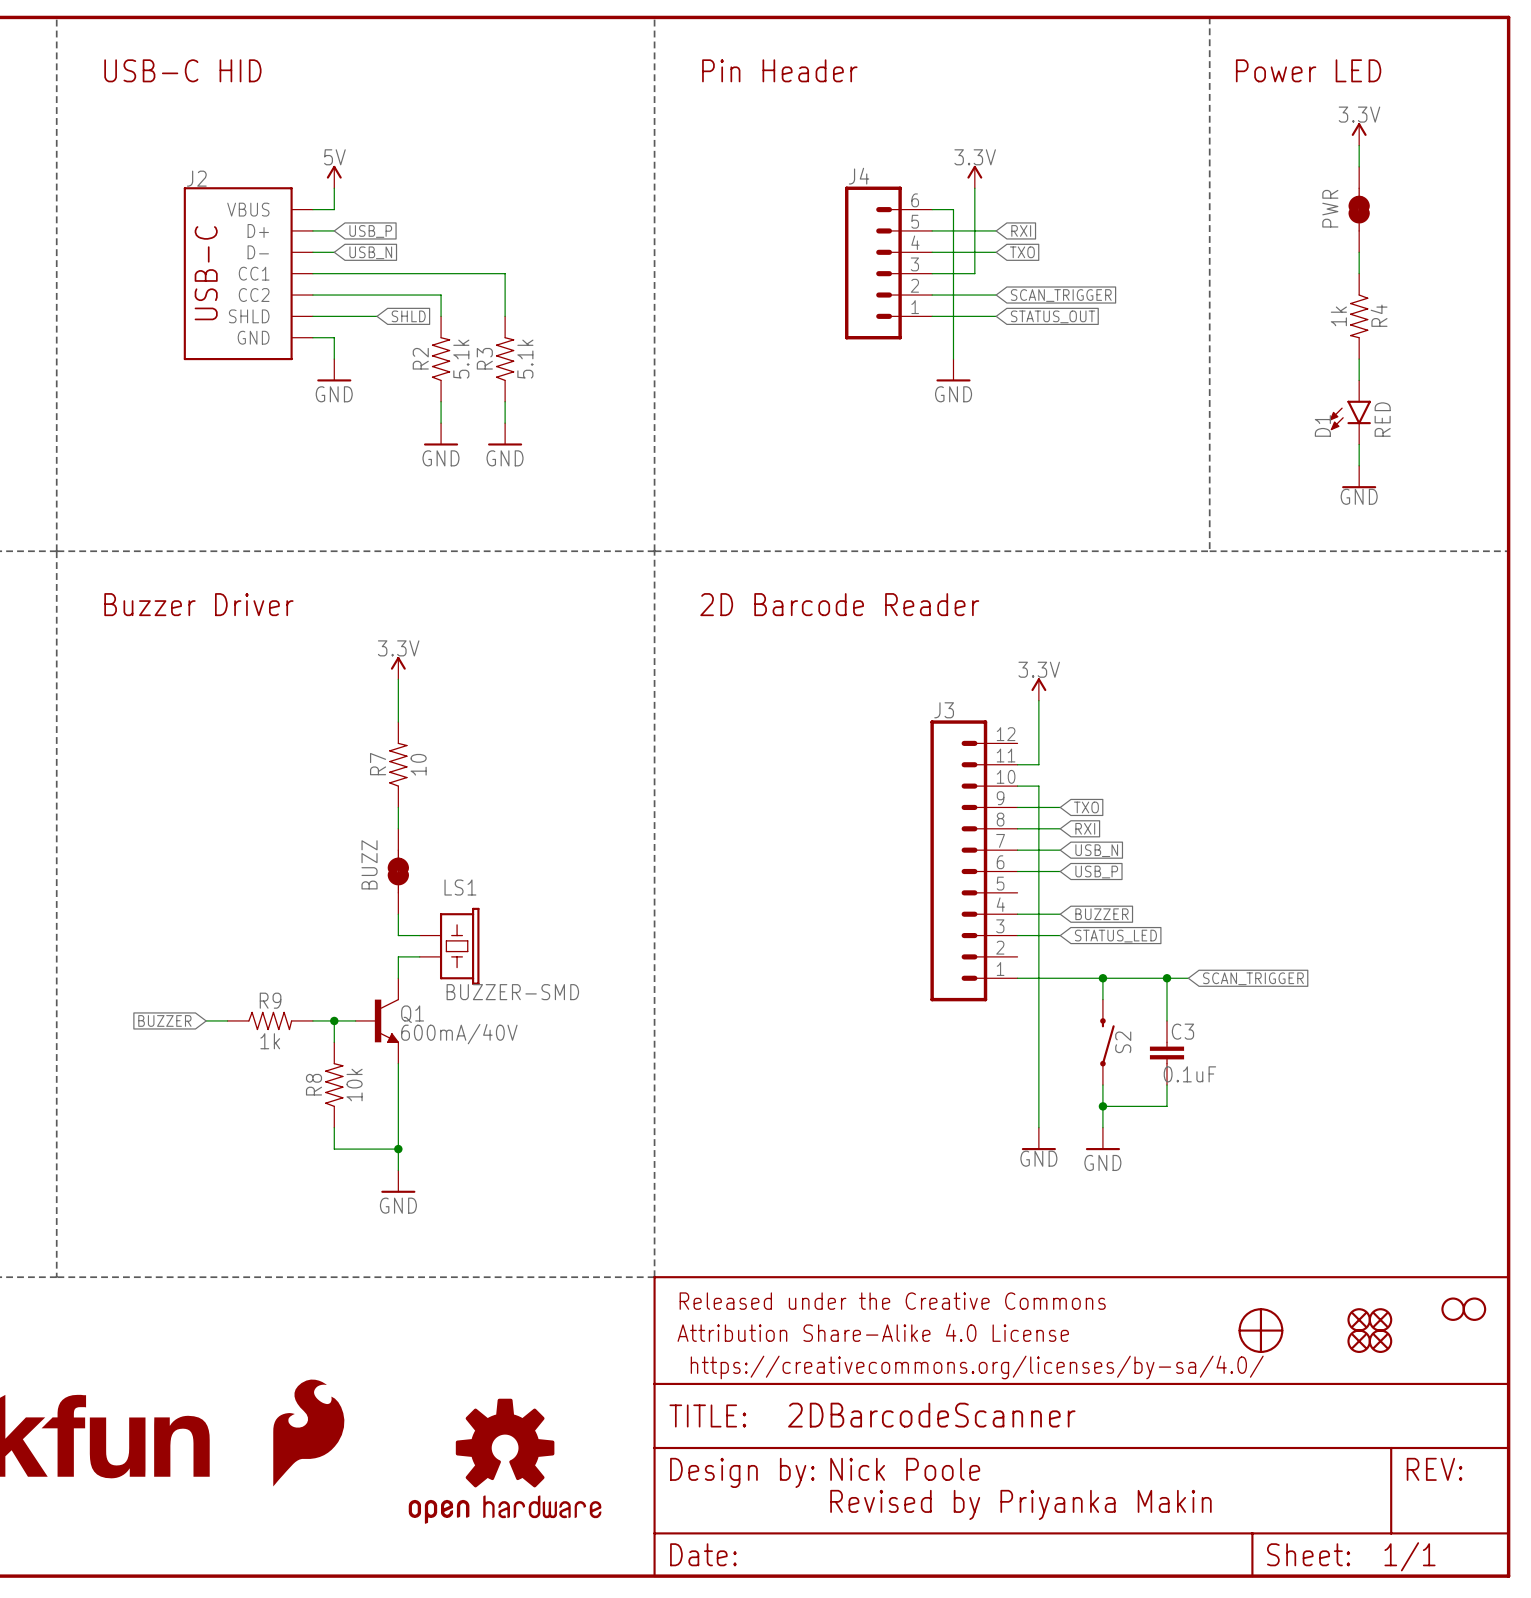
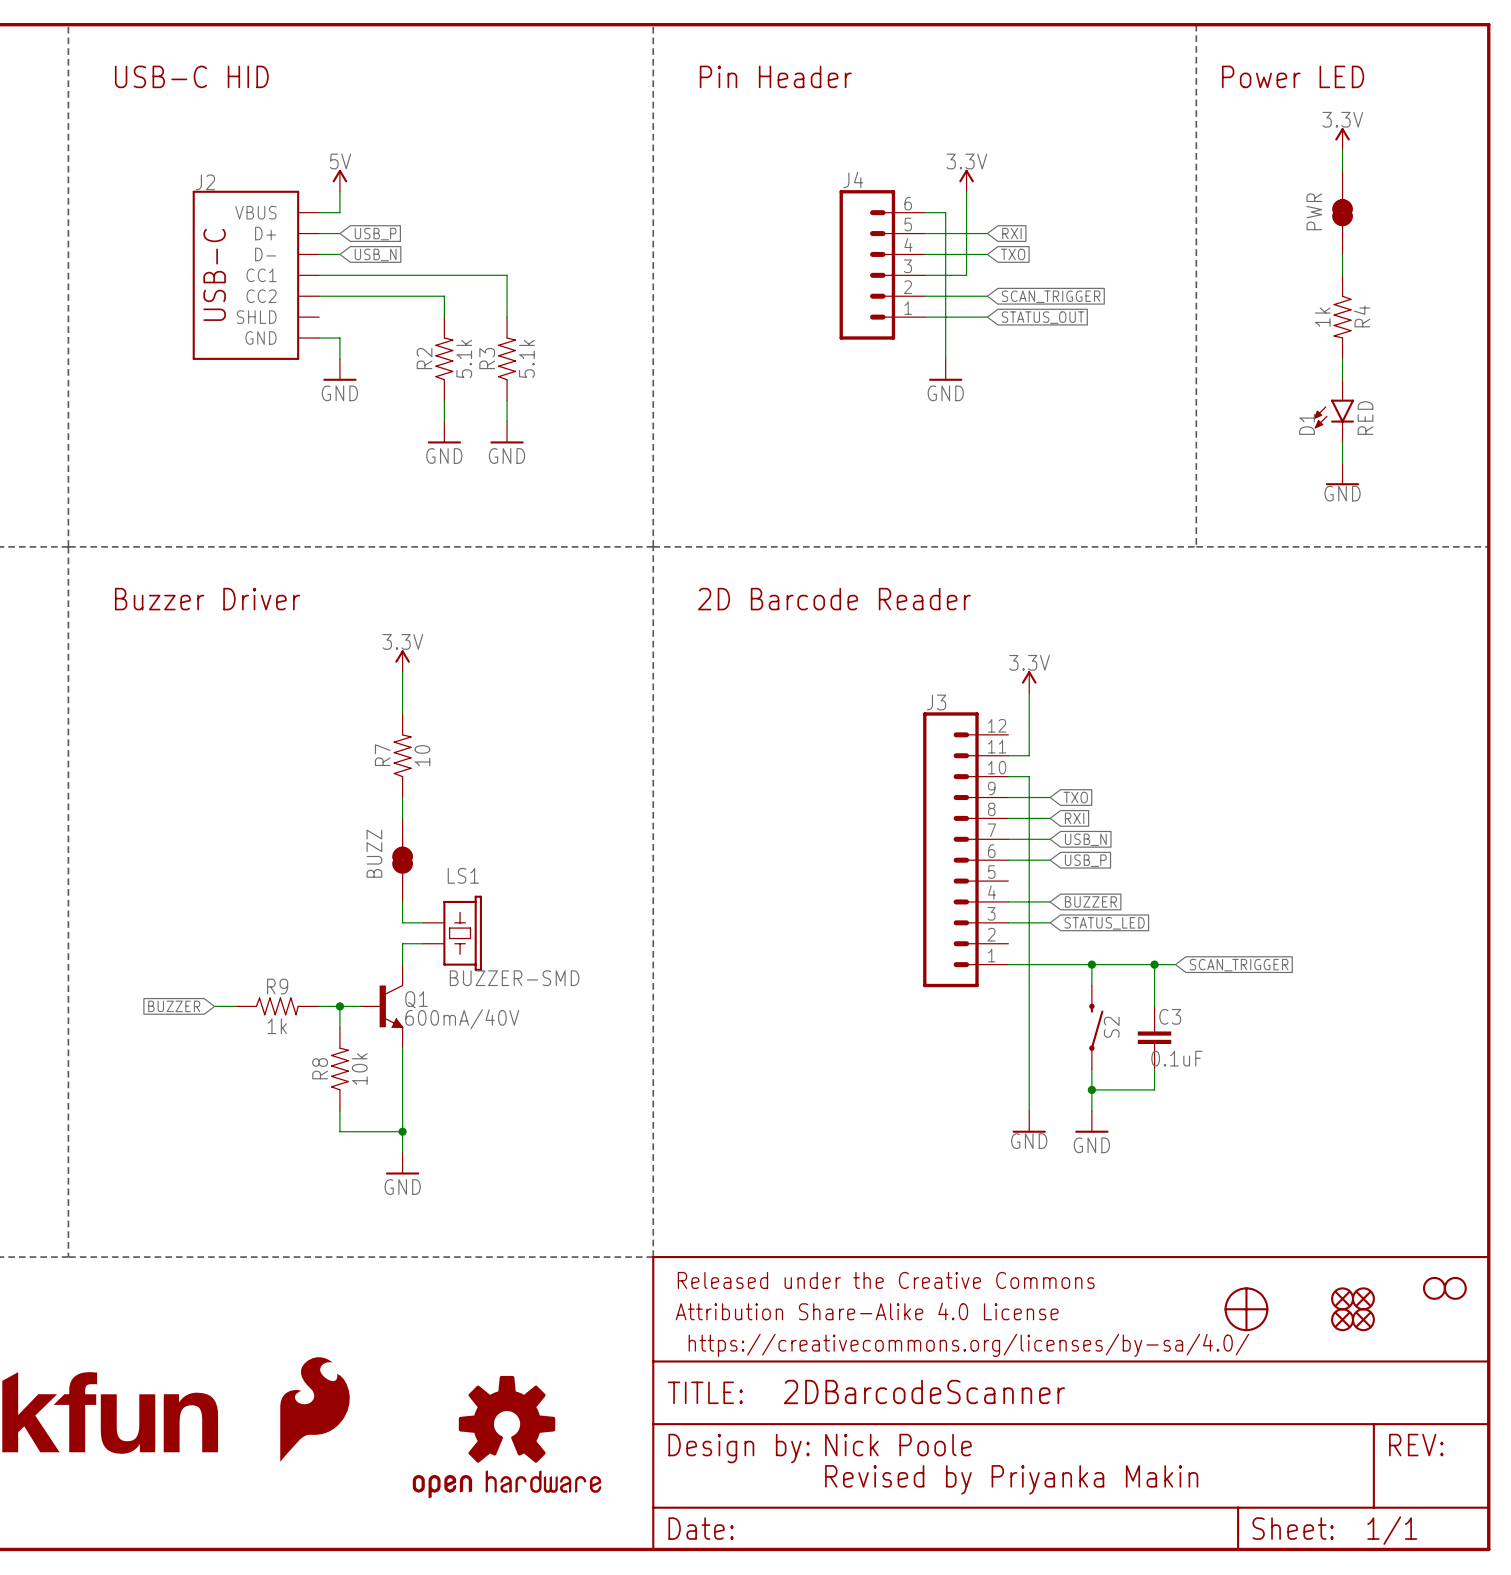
wire: (312, 316) (376, 316) -> none
global label: SHLD (408, 316) -> none

